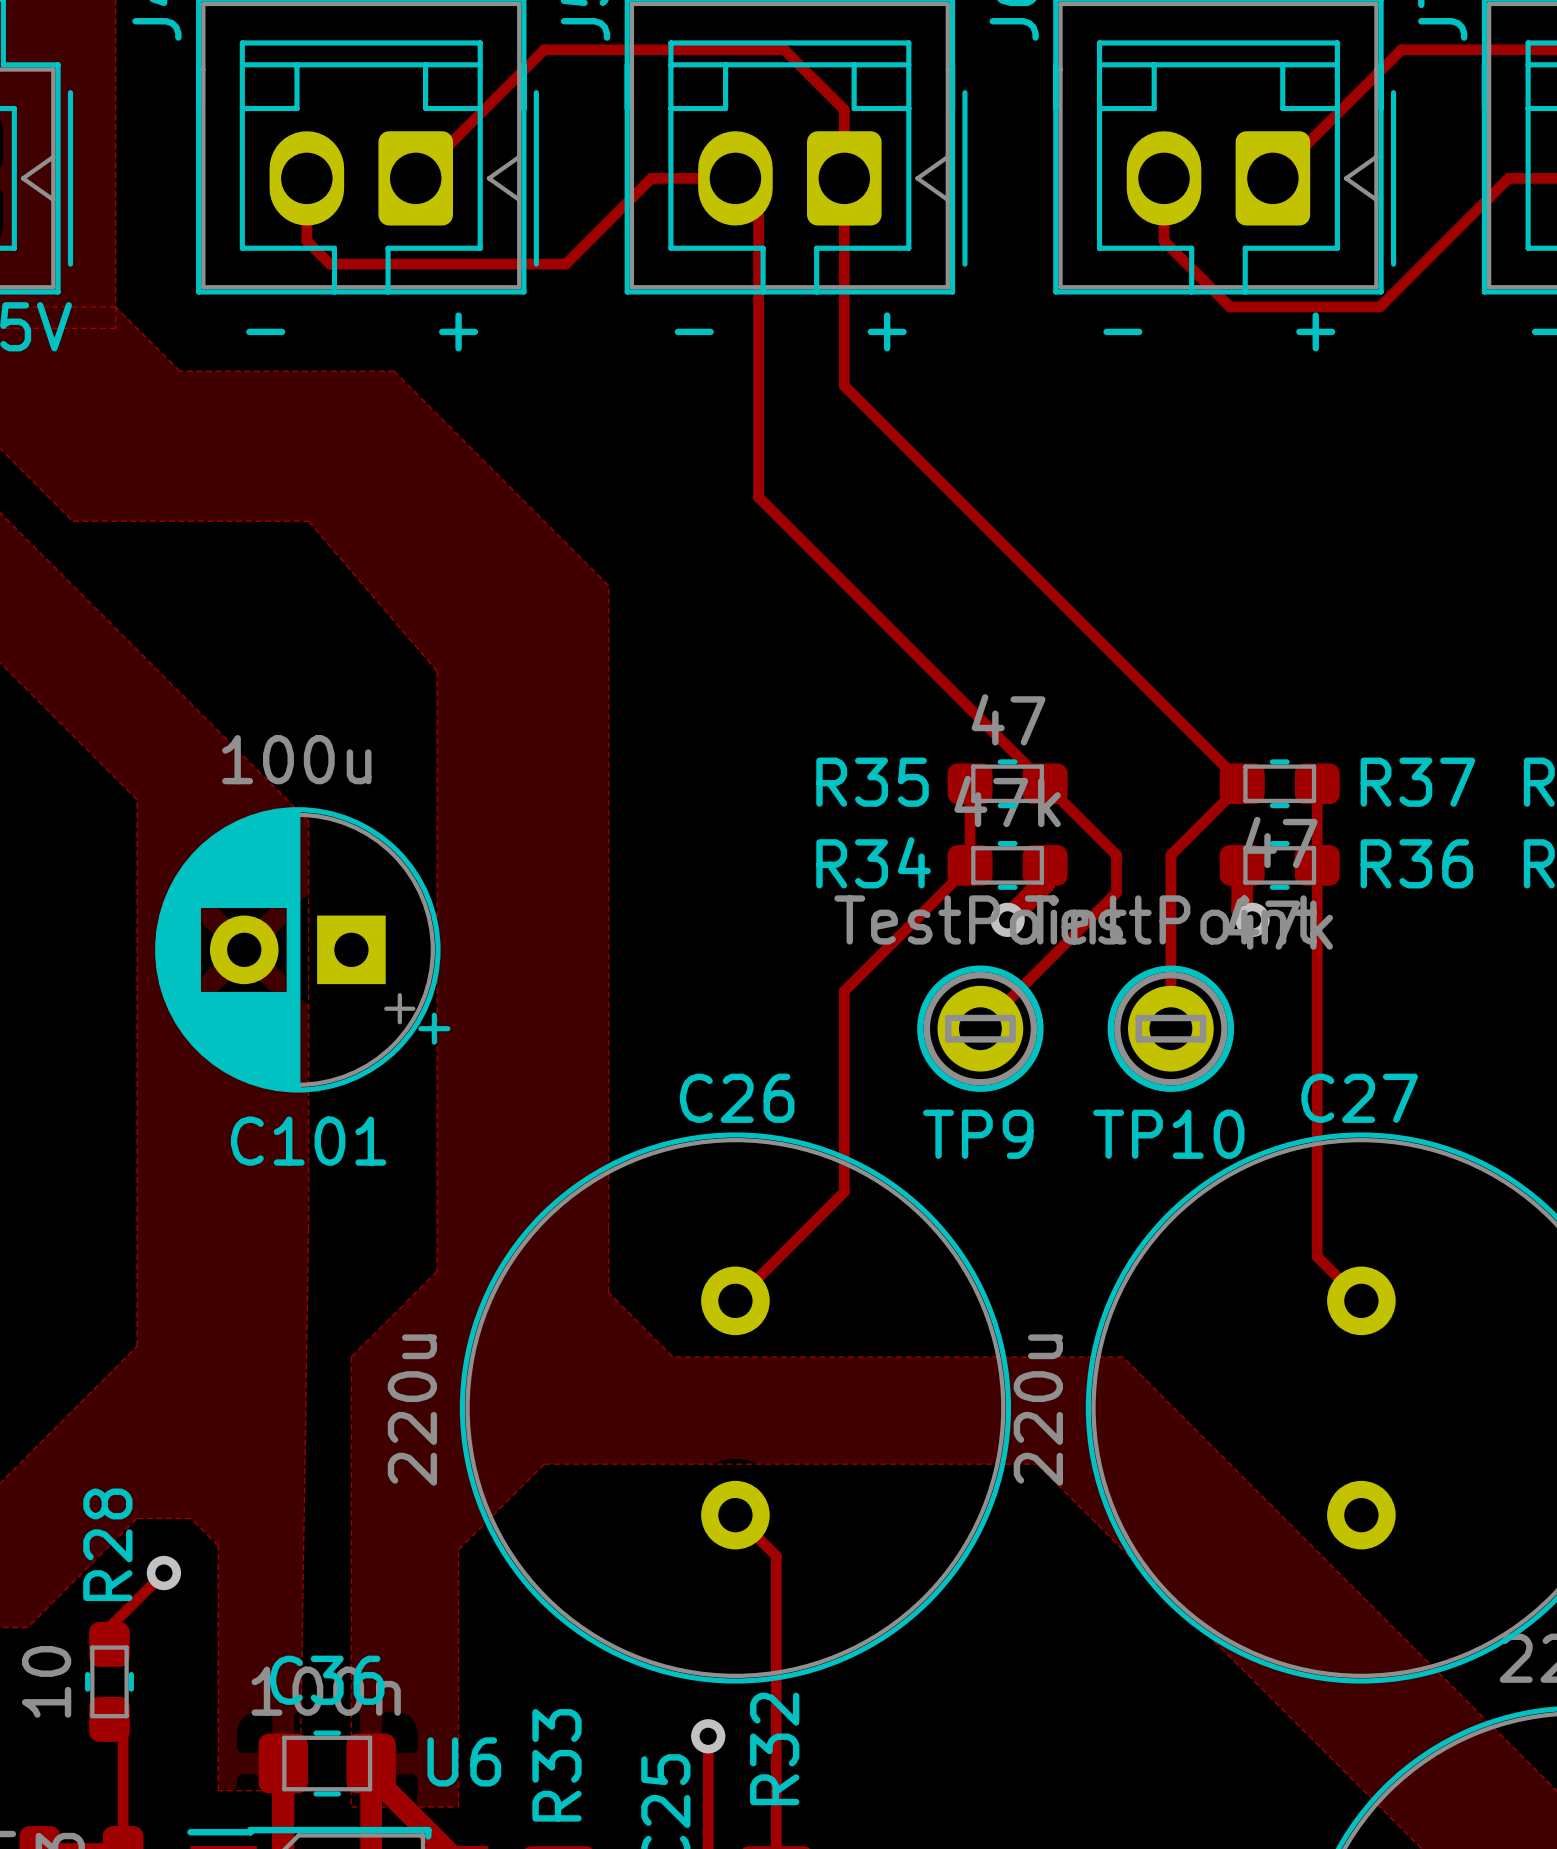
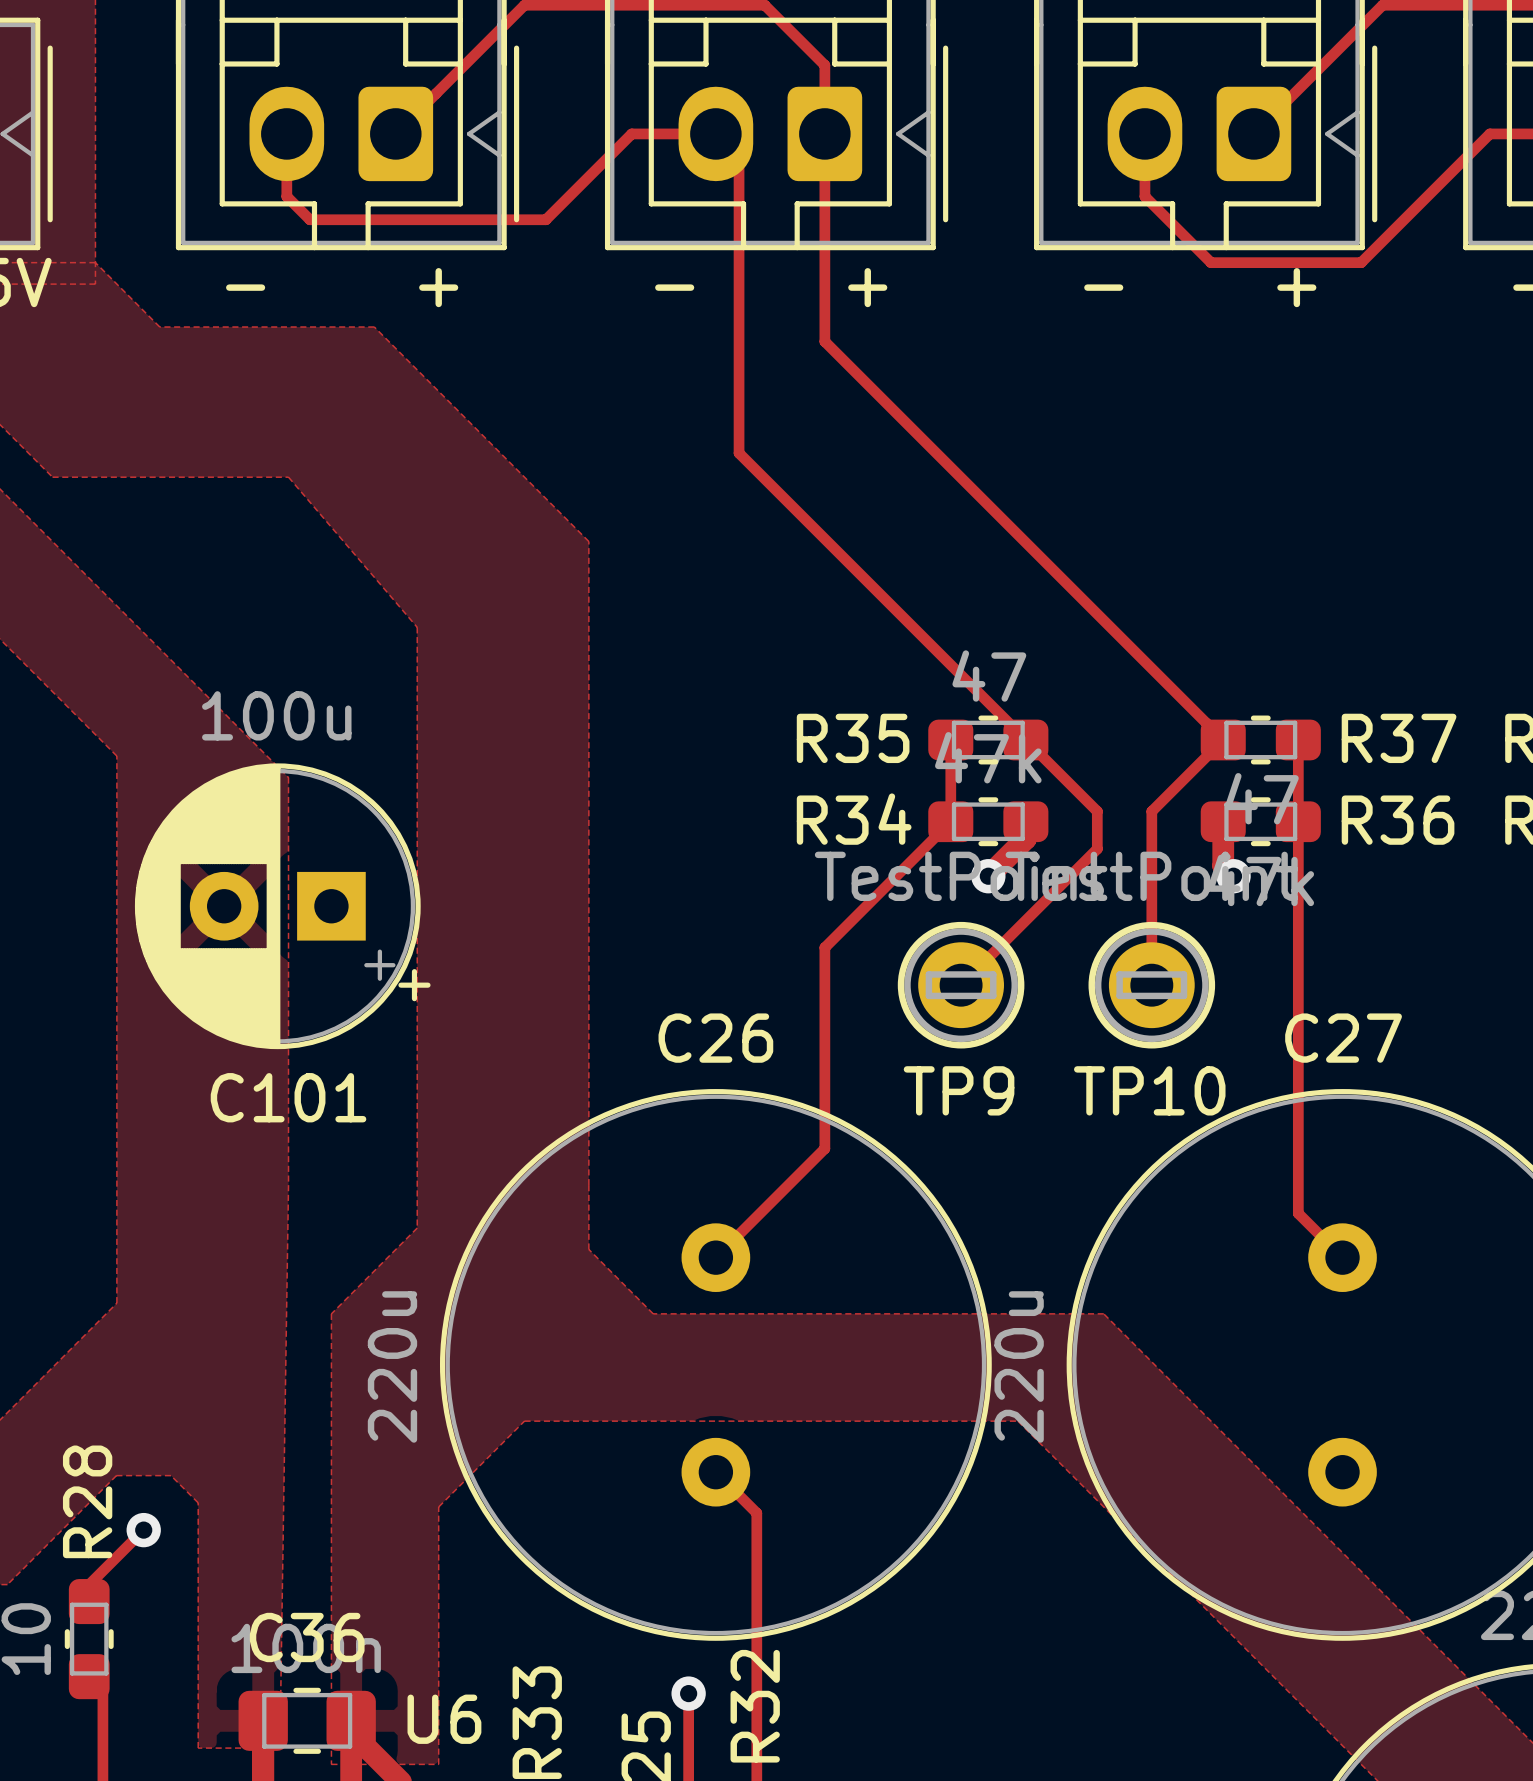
C26 name position: C26 (737, 1098) -> C26 (715, 1038)
C27 name position: C27 (1359, 1098) -> C27 (1343, 1038)

